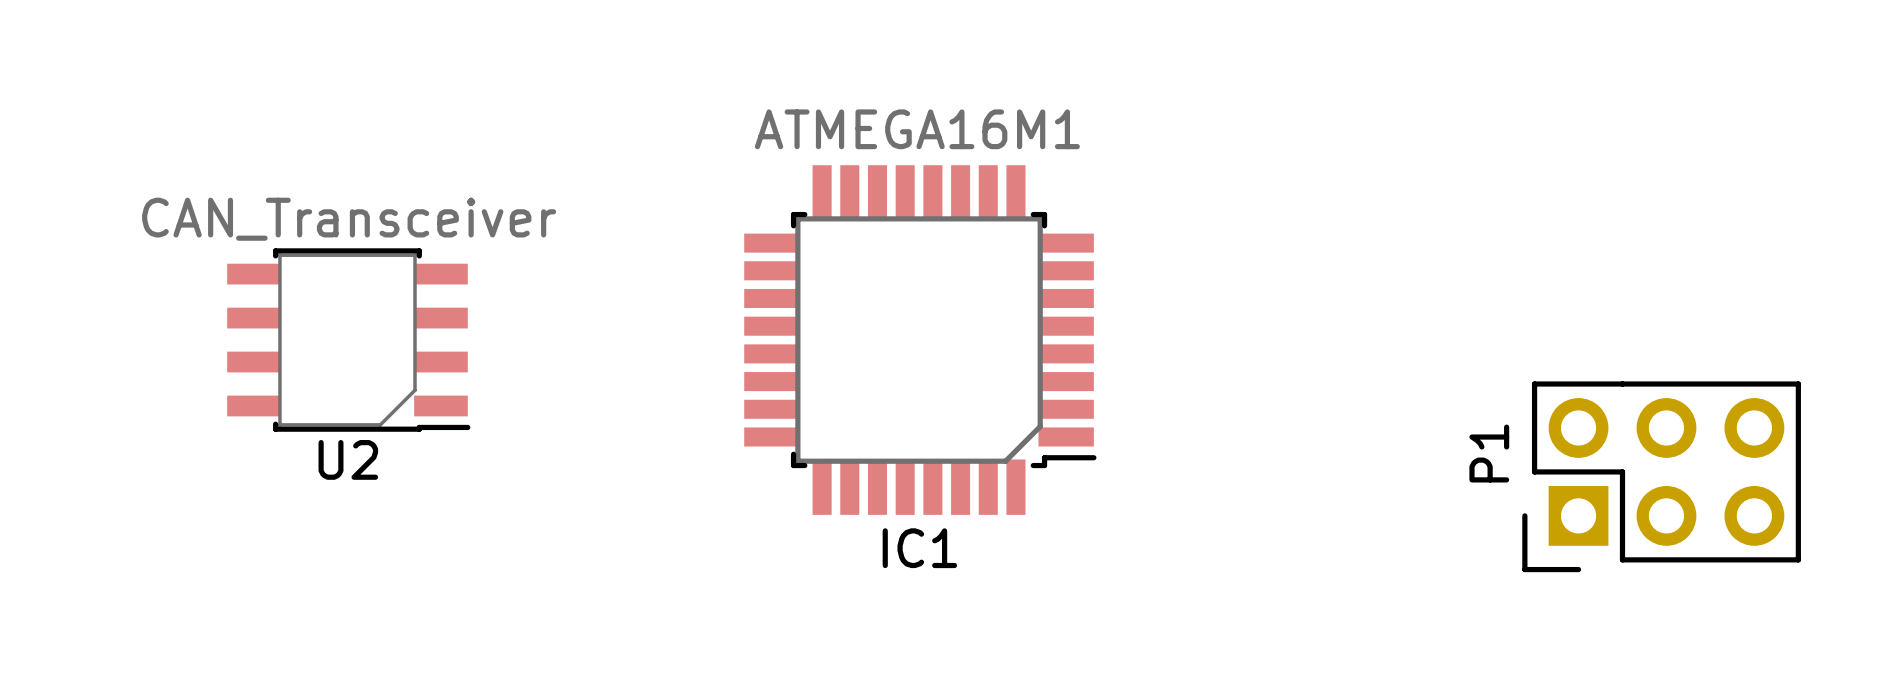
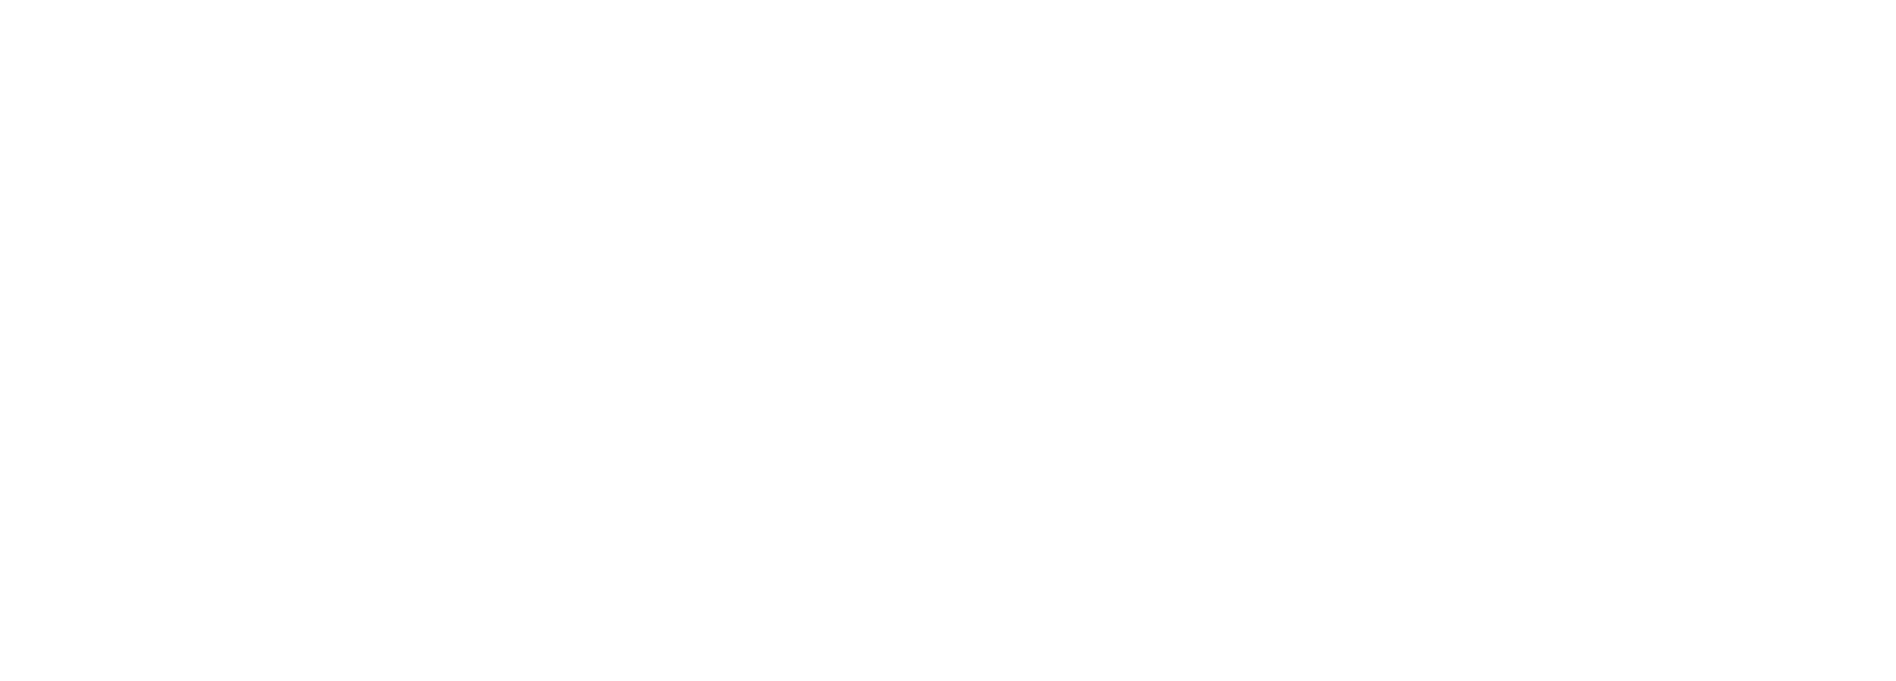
U2: CAN_Transceiver (348, 340) -> none
IC1: ATMEGA16M1 (920, 340) -> none
P1: (1661, 476) -> none

